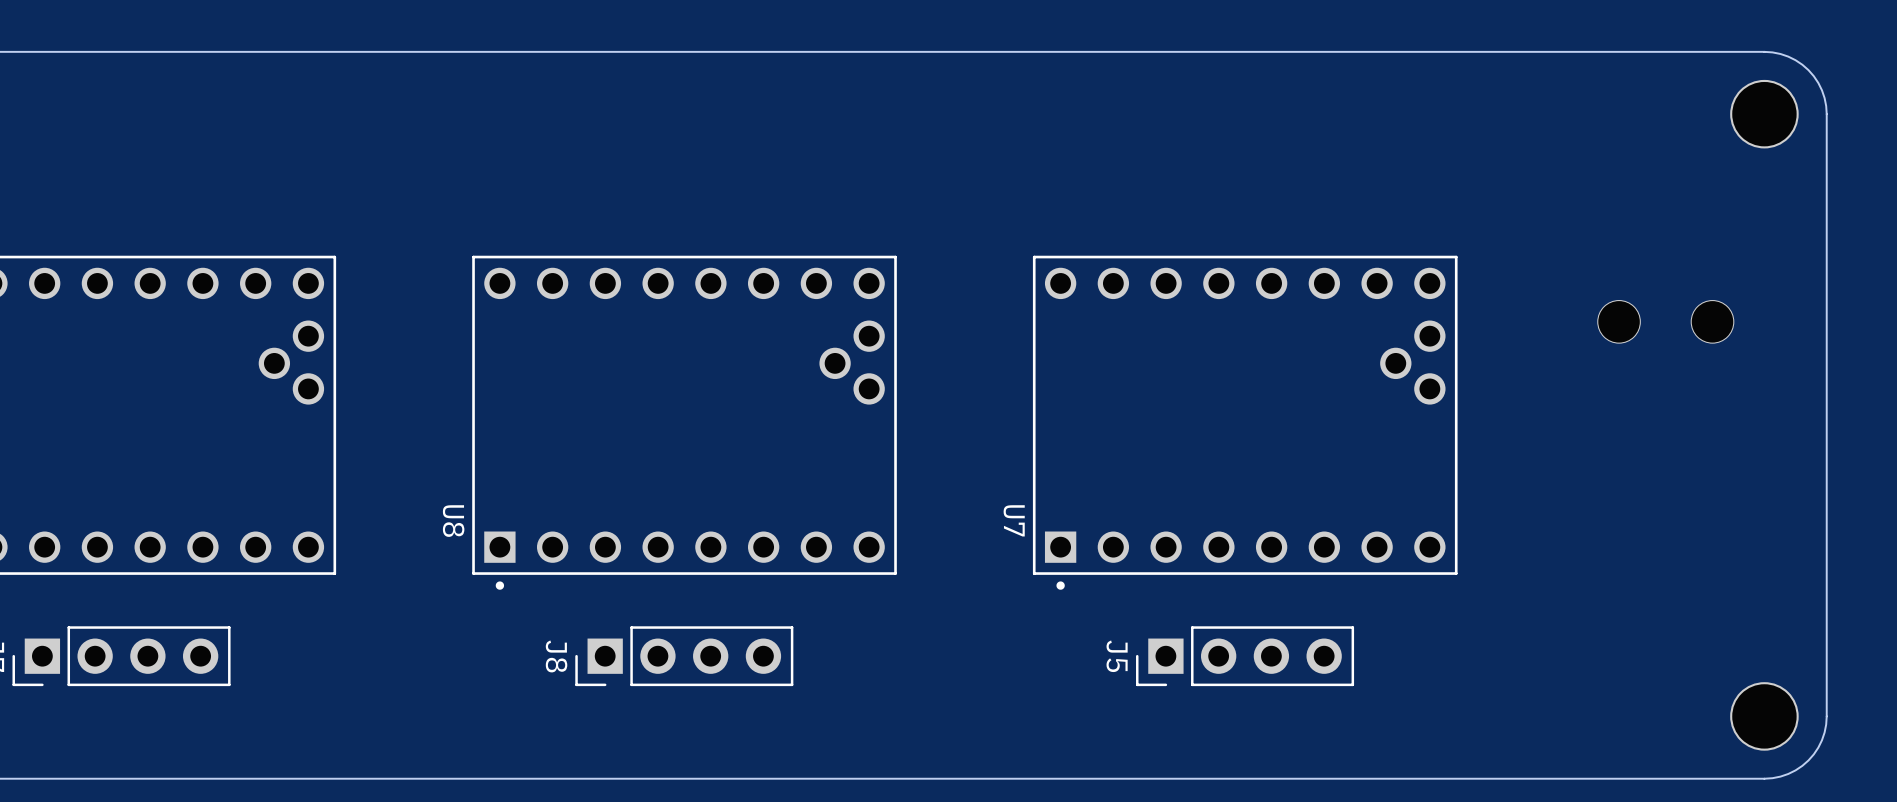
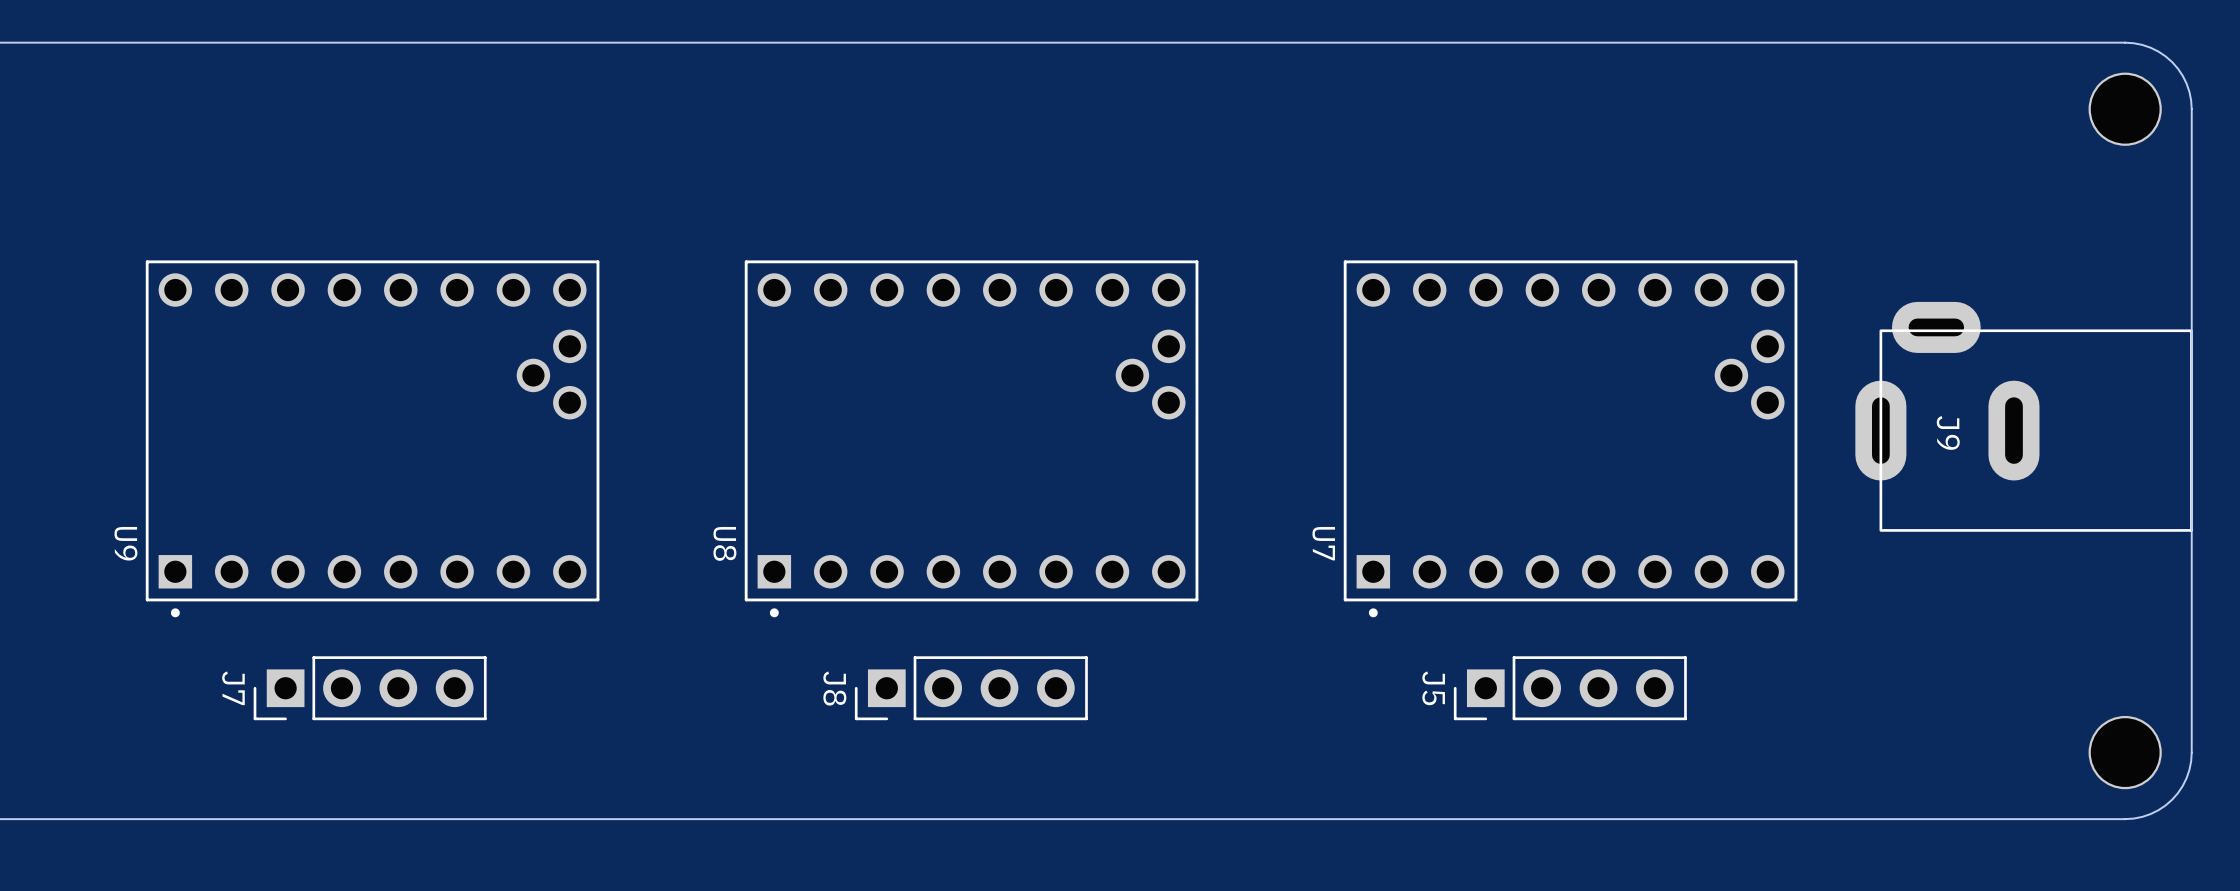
part: (1665, 321) -> none
J9: none -> (2024, 416)

